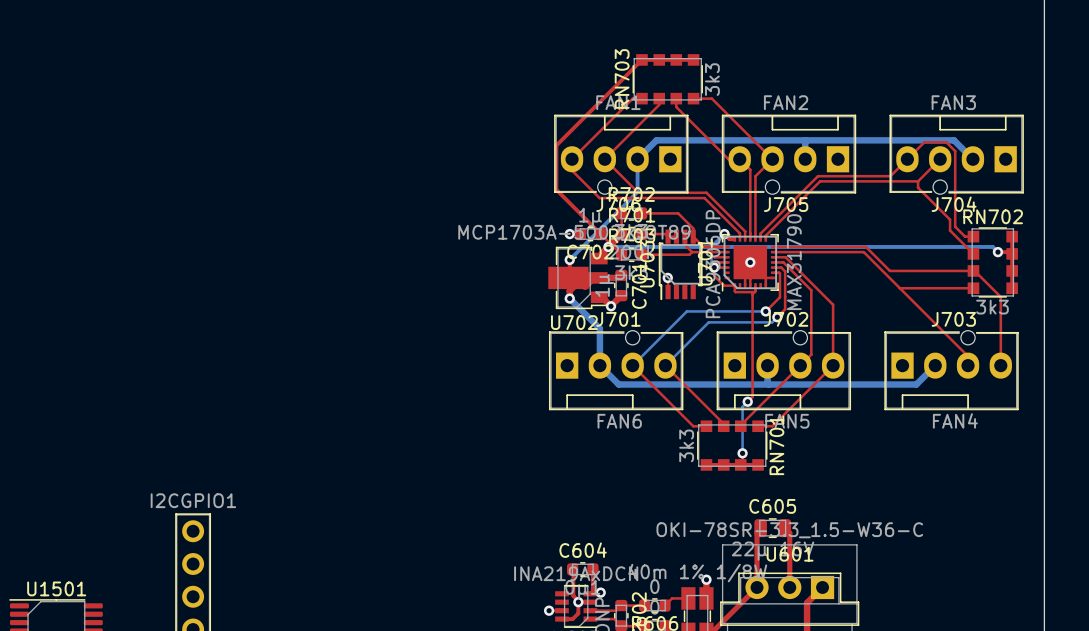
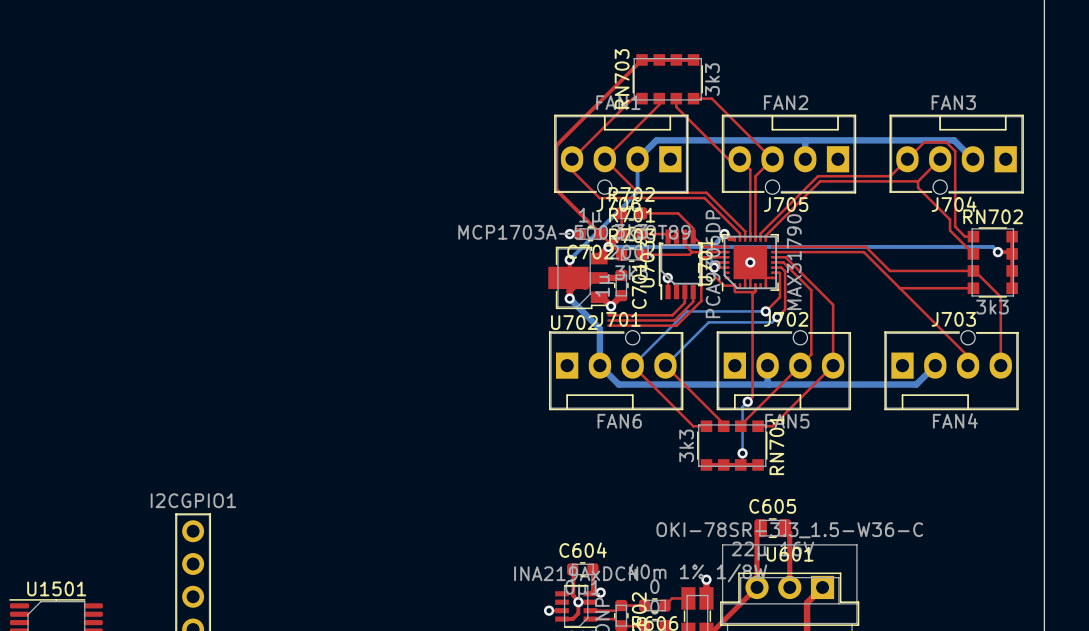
top track: none -> (714, 257) (703, 257) (701, 259) (701, 301) (676, 325) (608, 325)
top track: none -> (684, 292) (684, 302) (672, 315) (608, 315)
top track: none -> (693, 292) (693, 301) (674, 320) (608, 320)

